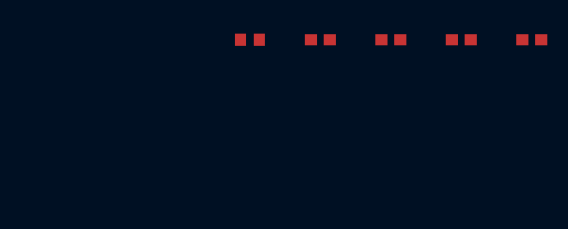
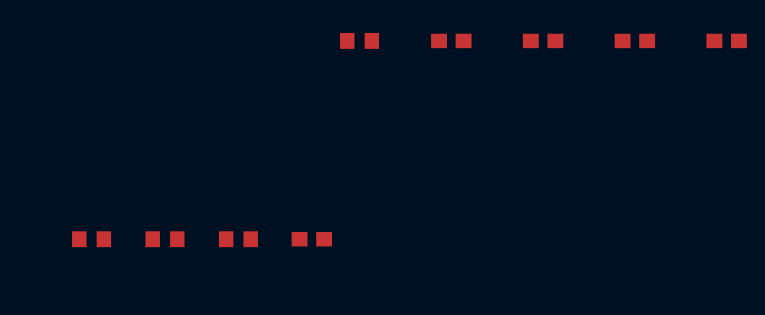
part: none -> (91, 239)
part: none -> (165, 239)
part: none -> (238, 239)
part: none -> (311, 239)

